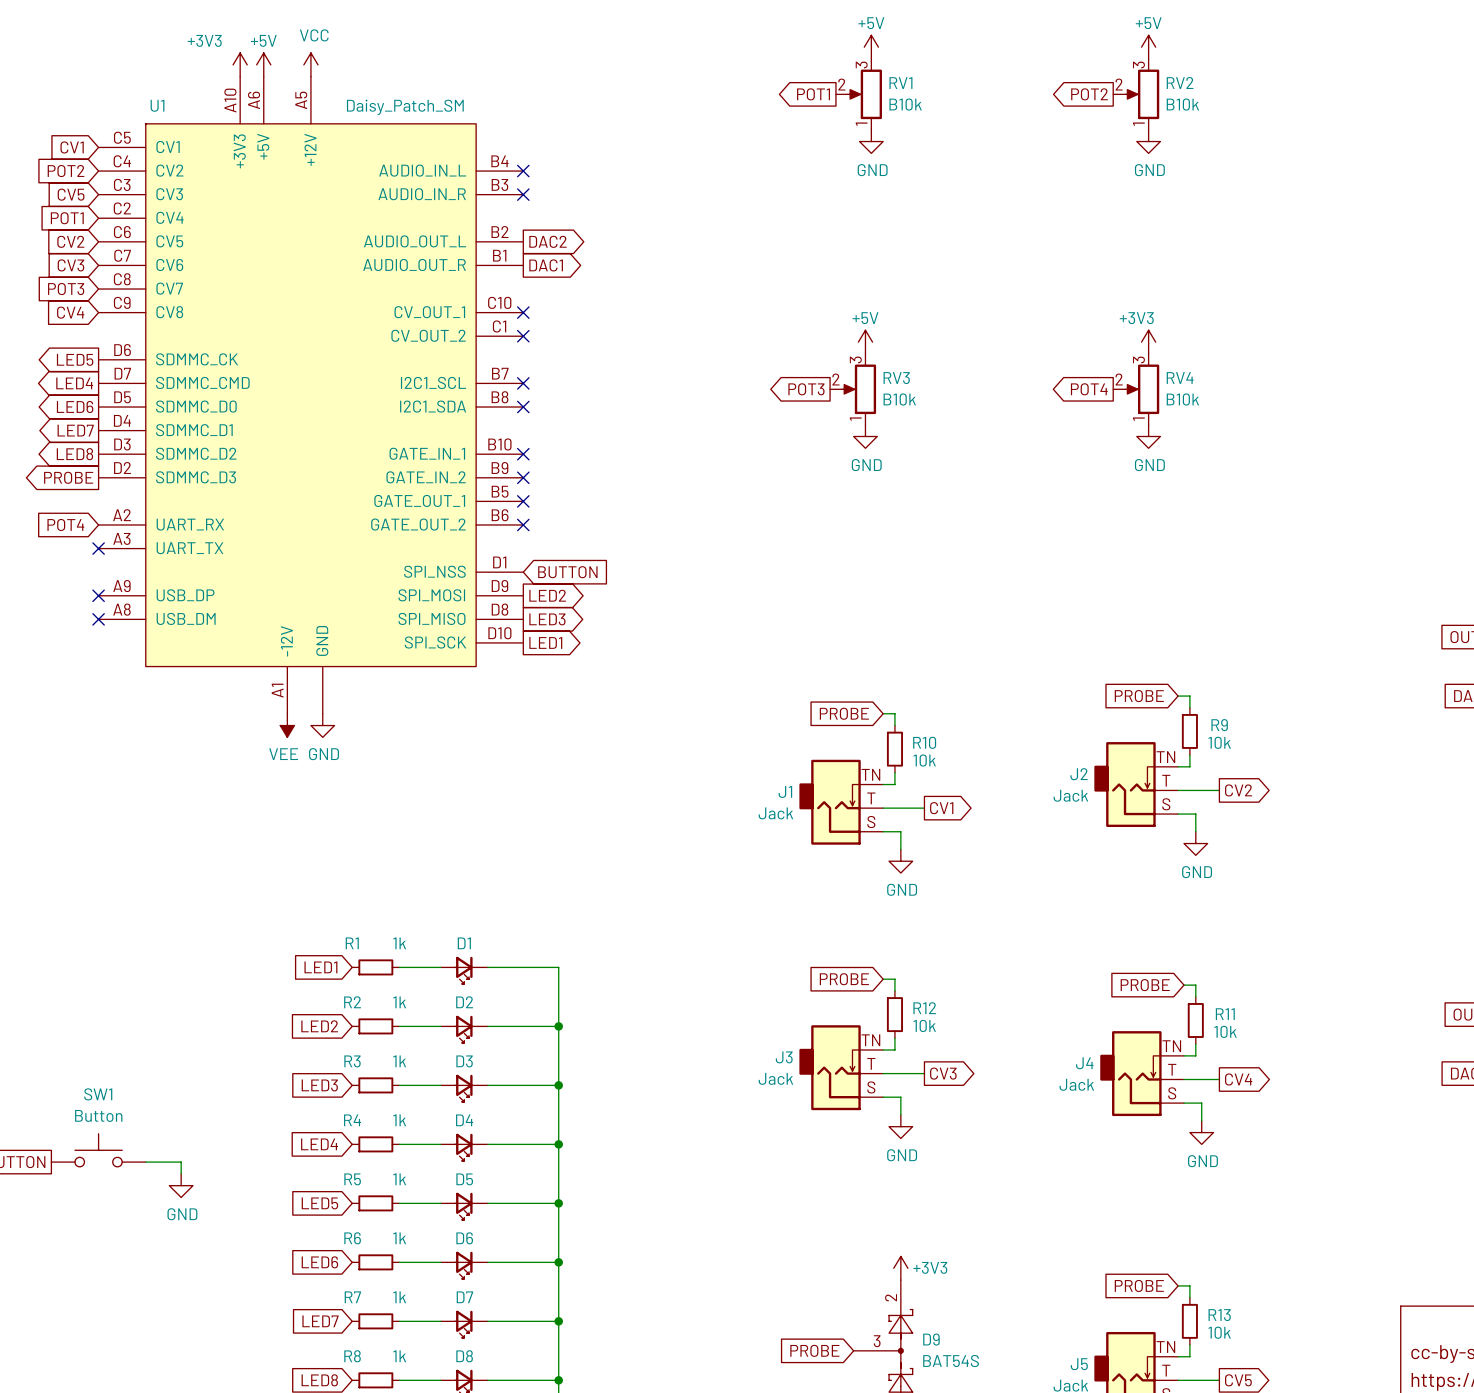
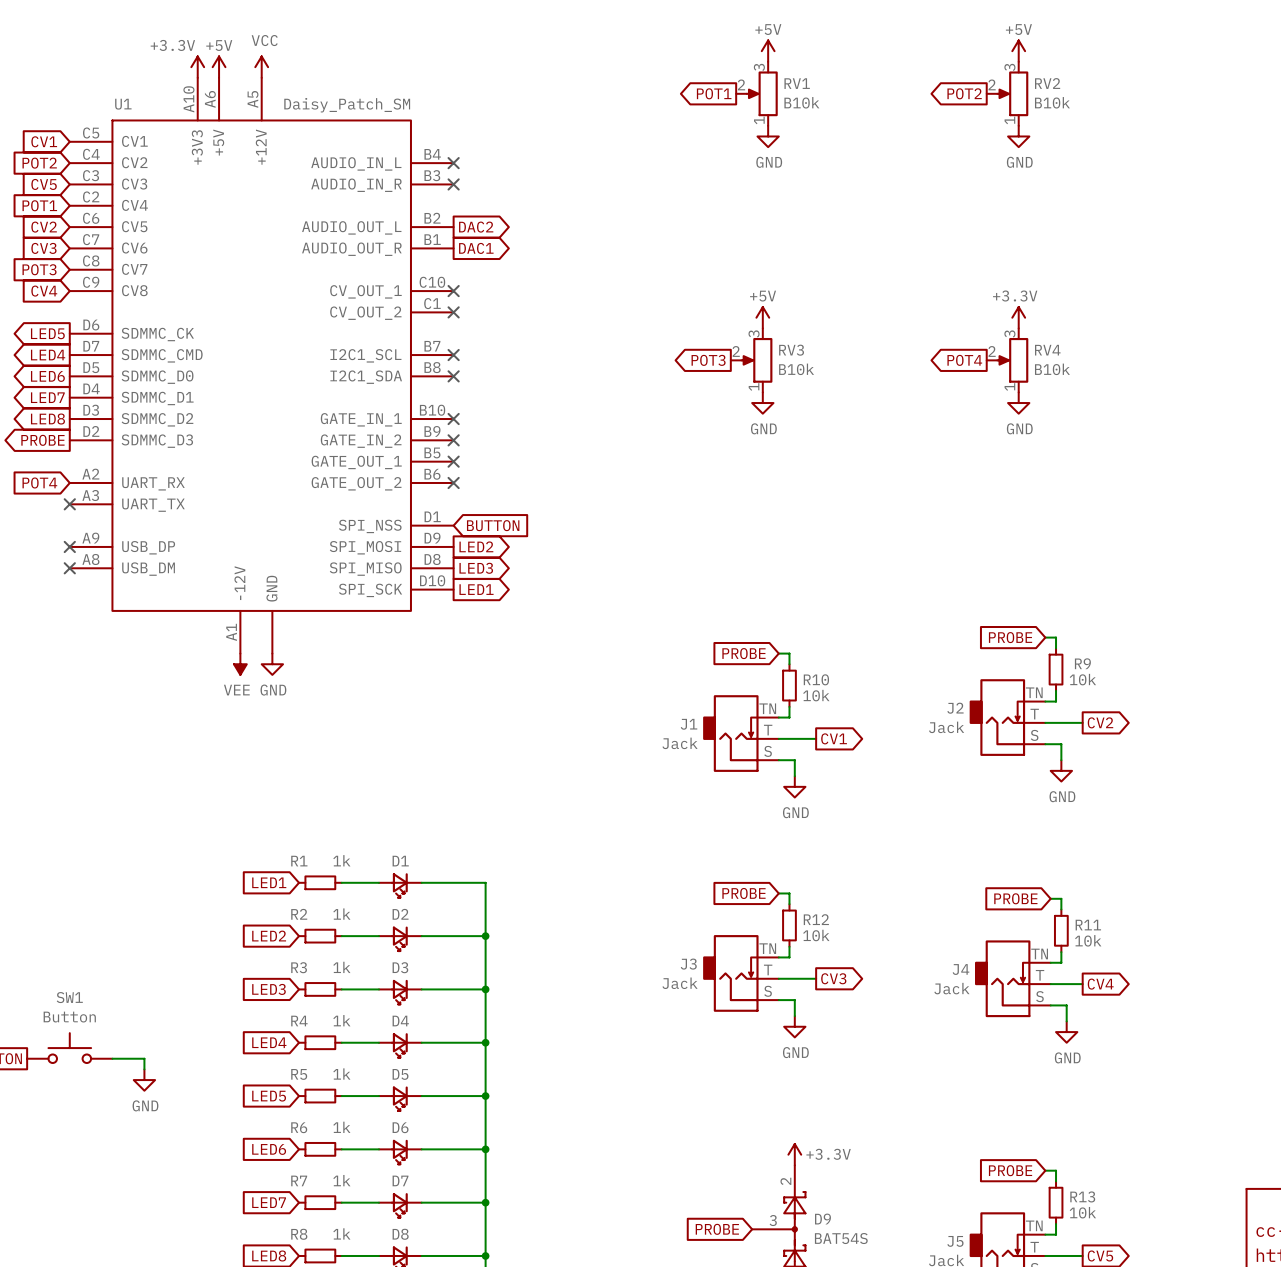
power symbol: +3V3 (240, 64) -> +3.3V (197, 67)
power symbol: +3V3 (1148, 342) -> +3.3V (1018, 317)
power symbol: +3V3 (900, 1268) -> +3.3V (794, 1154)

